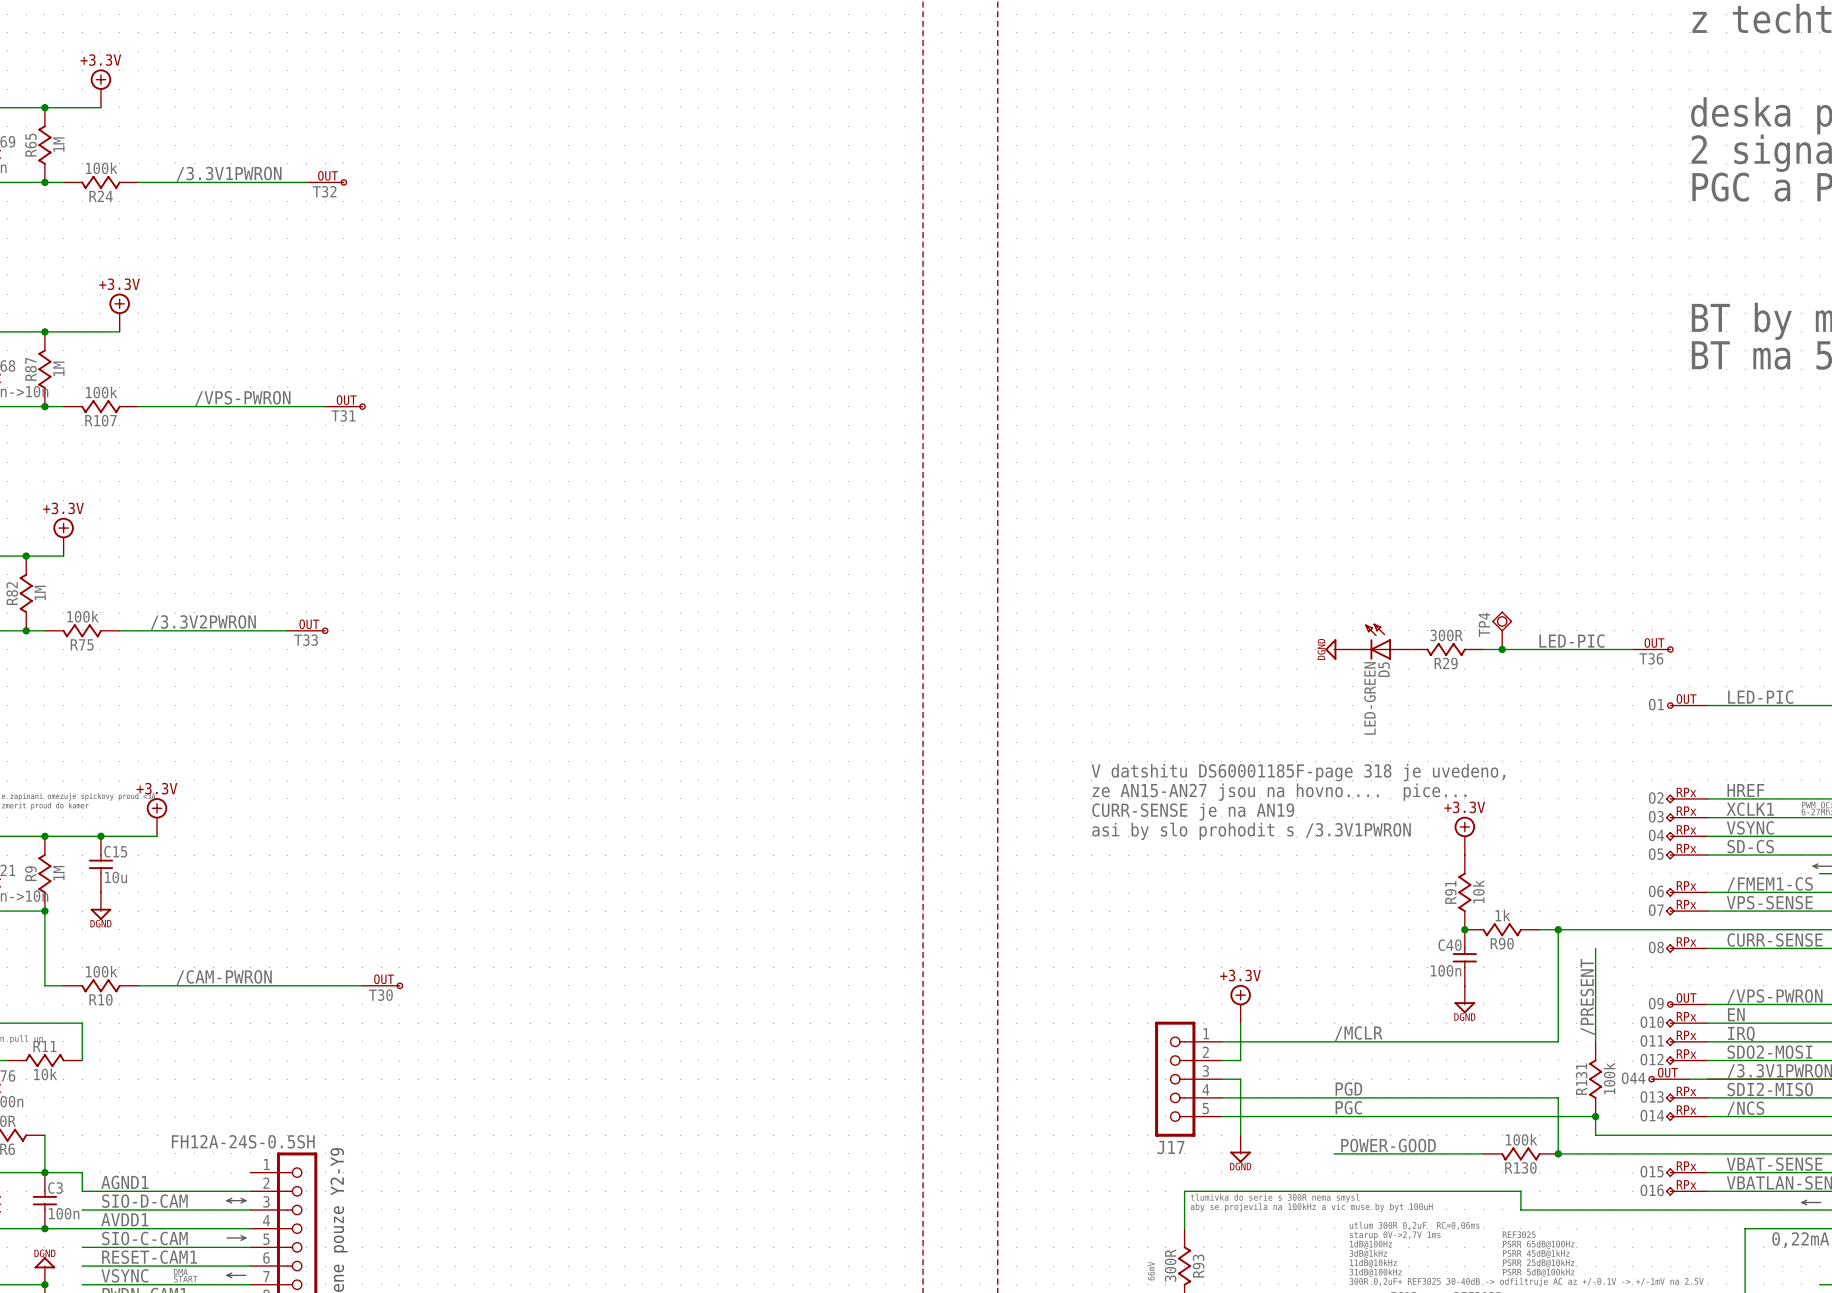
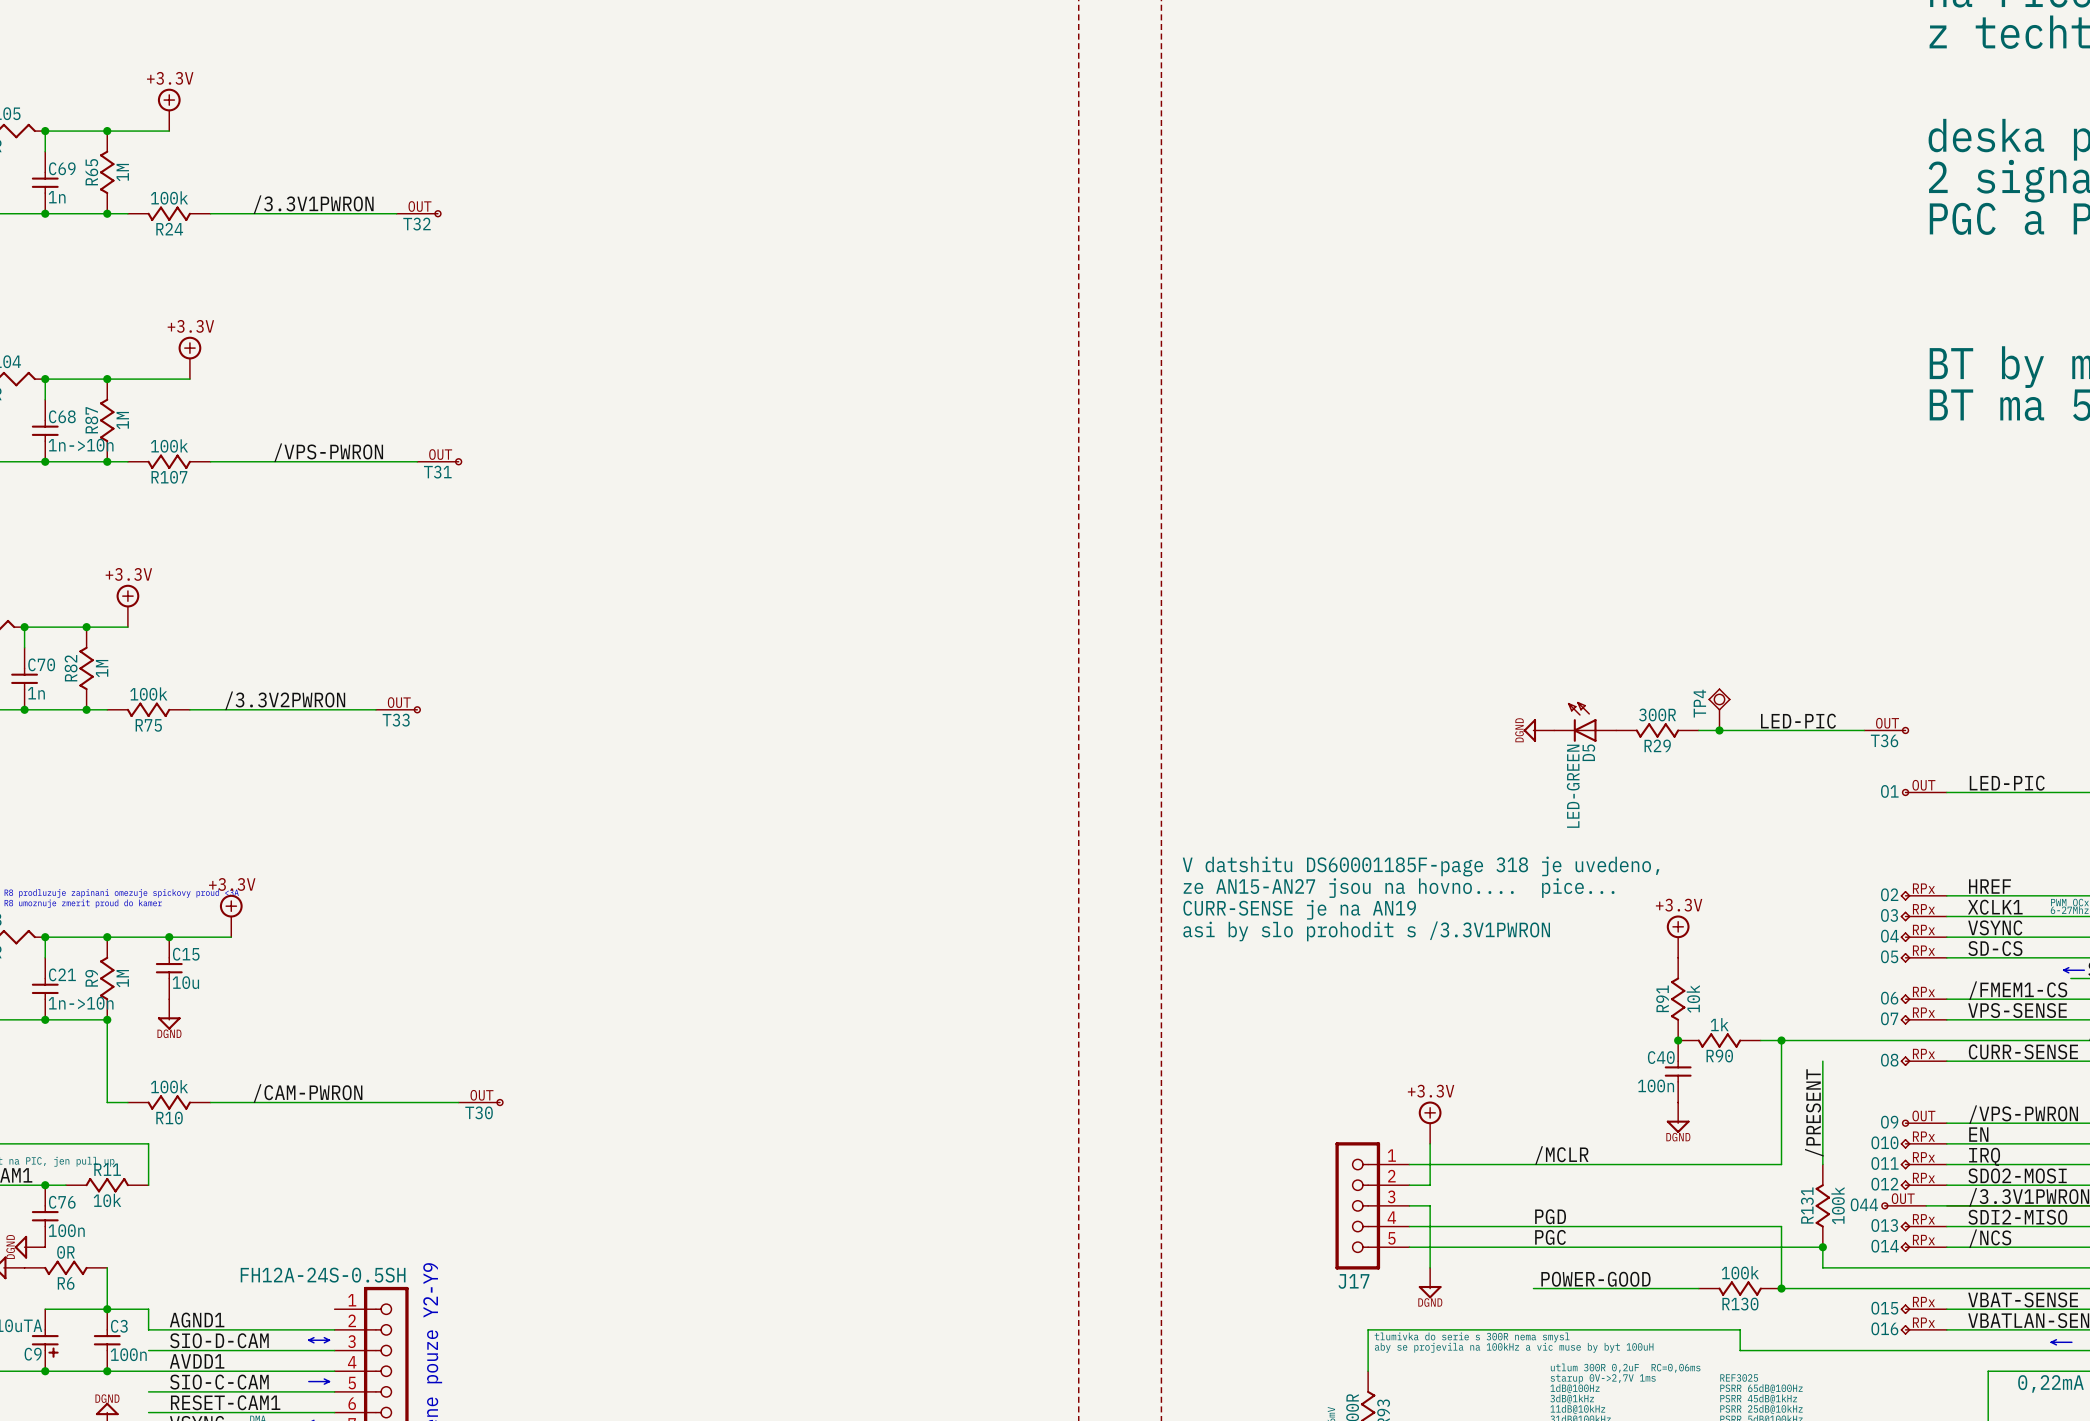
text position: V datshitu DS60001185F-page 318 je uvedeno, (1298, 772) -> V datshitu DS60001185F-page 318 je uvedeno, (1421, 866)
text position: ze AN15-AN27 jsou na hovno.... pice... (1279, 792) -> ze AN15-AN27 jsou na hovno.... pice... (1399, 888)
text position: CURR-SENSE je na AN19 (1193, 811) -> CURR-SENSE je na AN19 (1299, 909)
text position: asi by slo prohodit s /3.3V1PWRON (1251, 831) -> asi by slo prohodit s /3.3V1PWRON (1366, 931)

